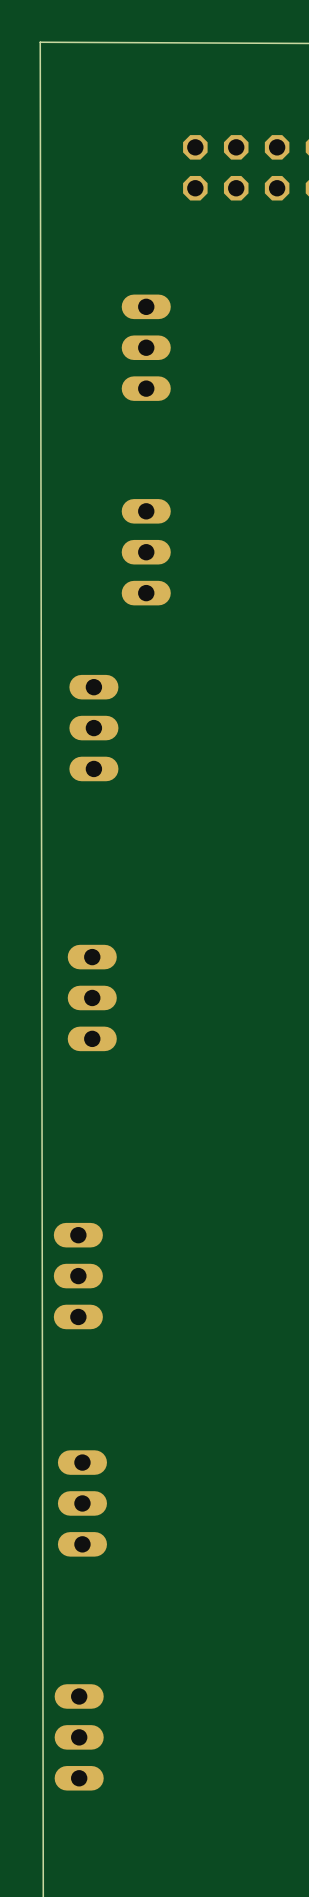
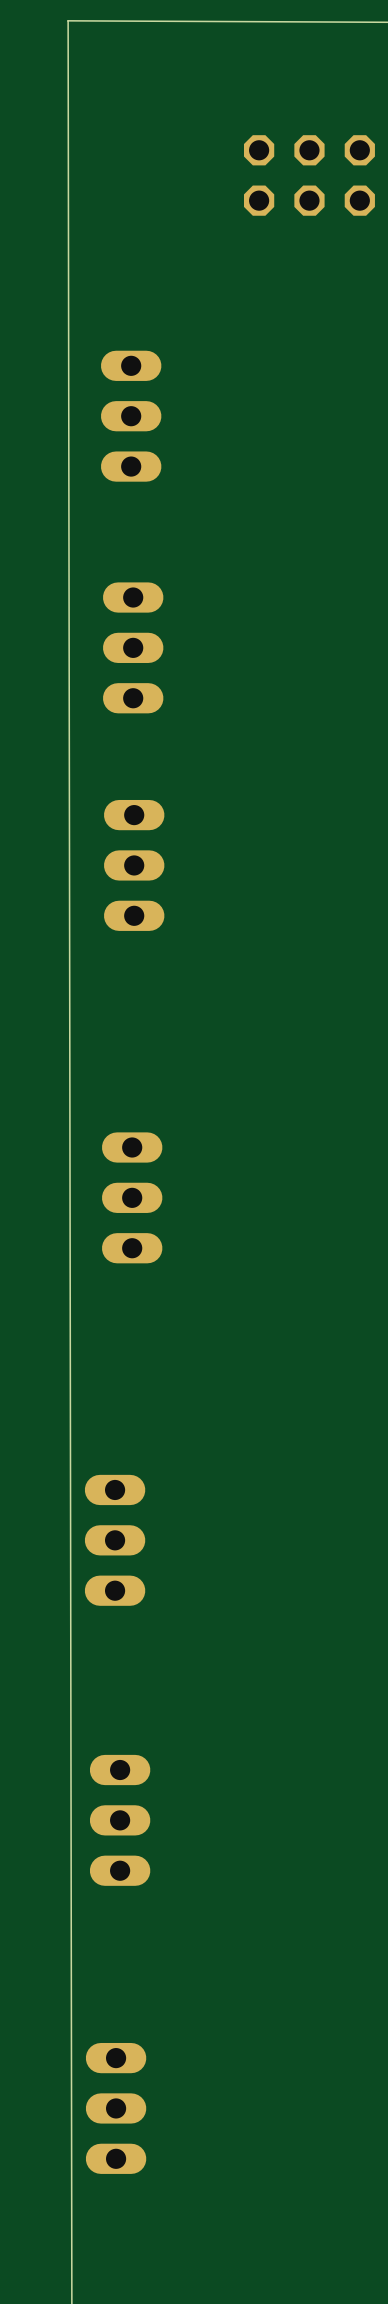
part position: (146, 347) -> (131, 416)
part position: (146, 552) -> (133, 647)

